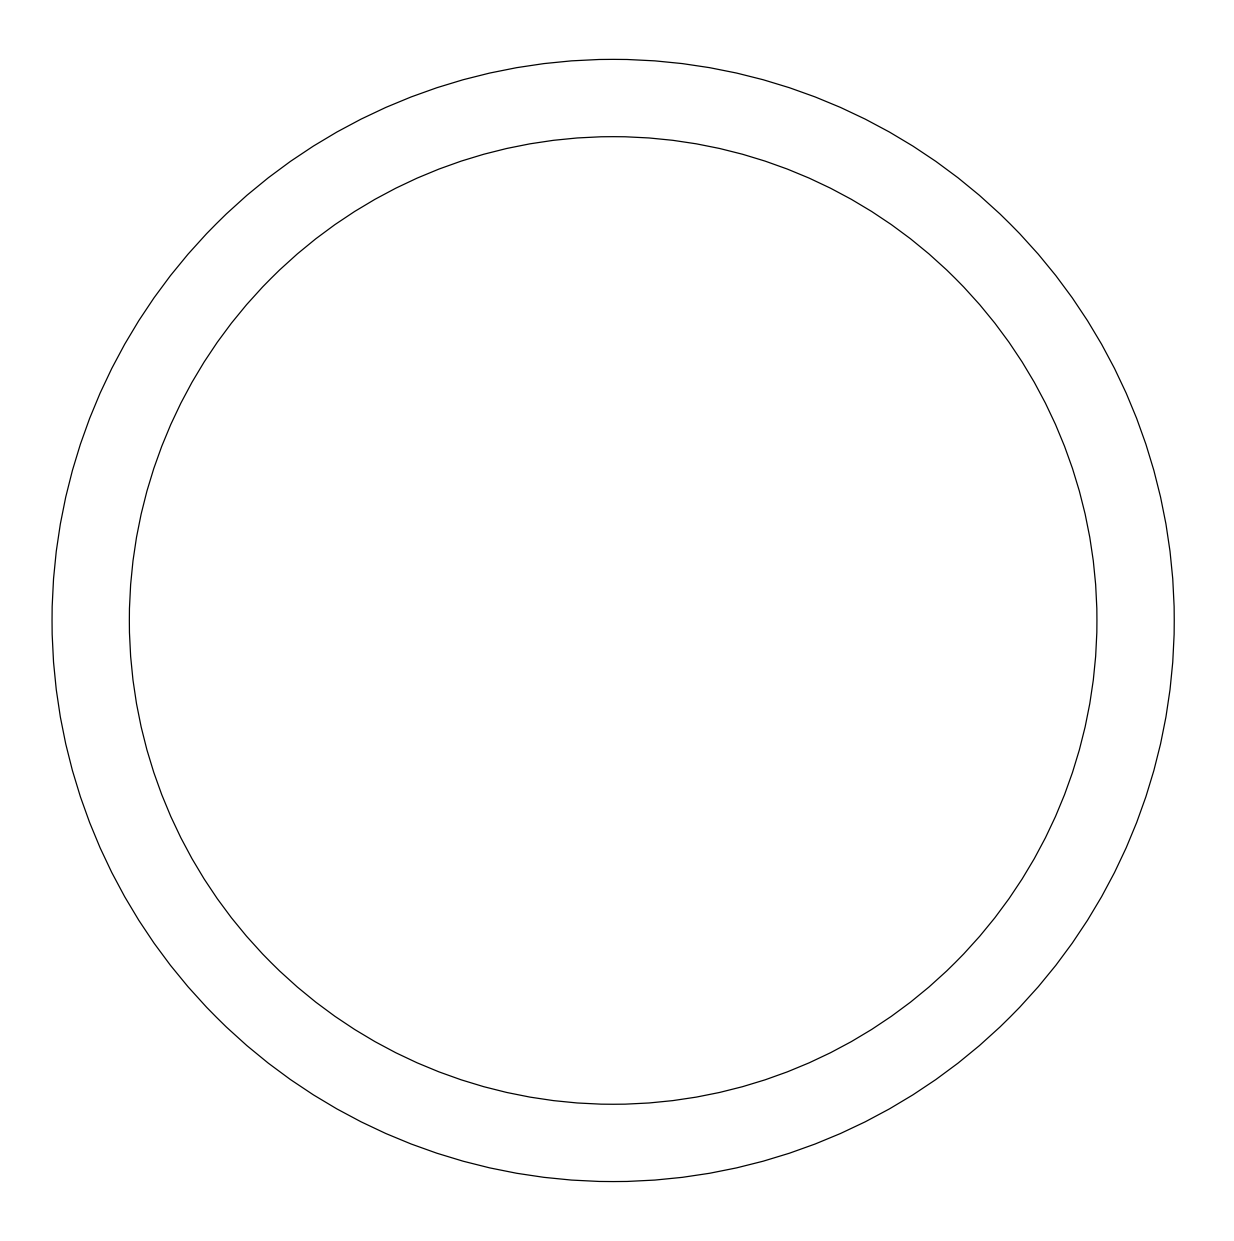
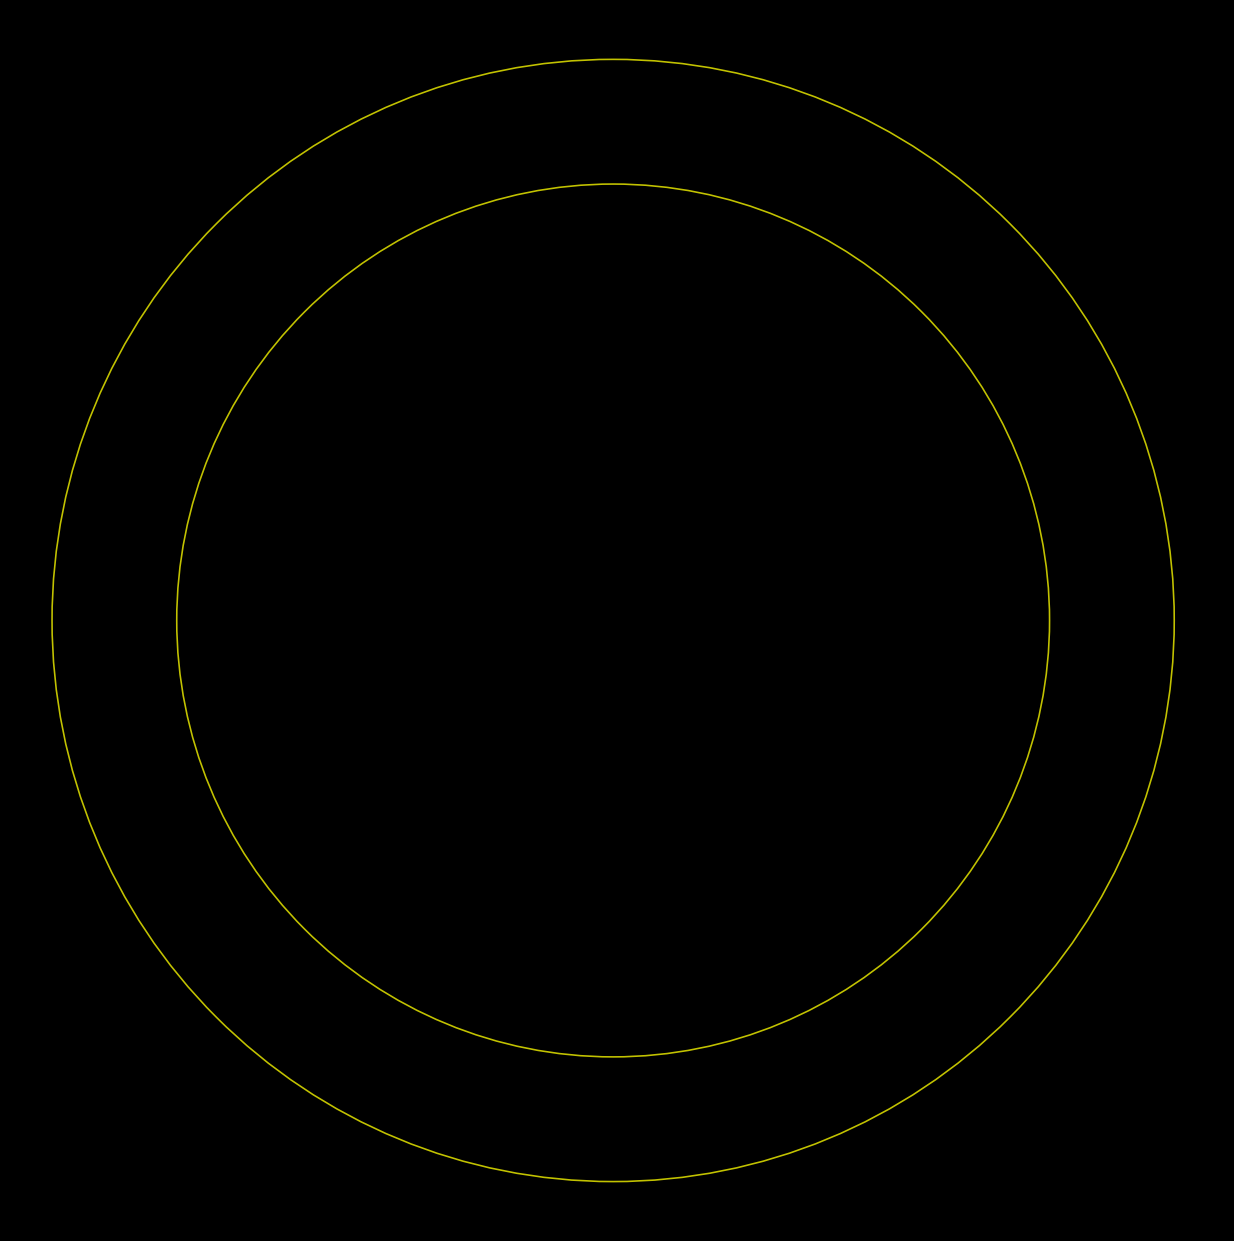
round board edge size: [128, 136, 1098, 1105] -> [176, 183, 1051, 1058]

